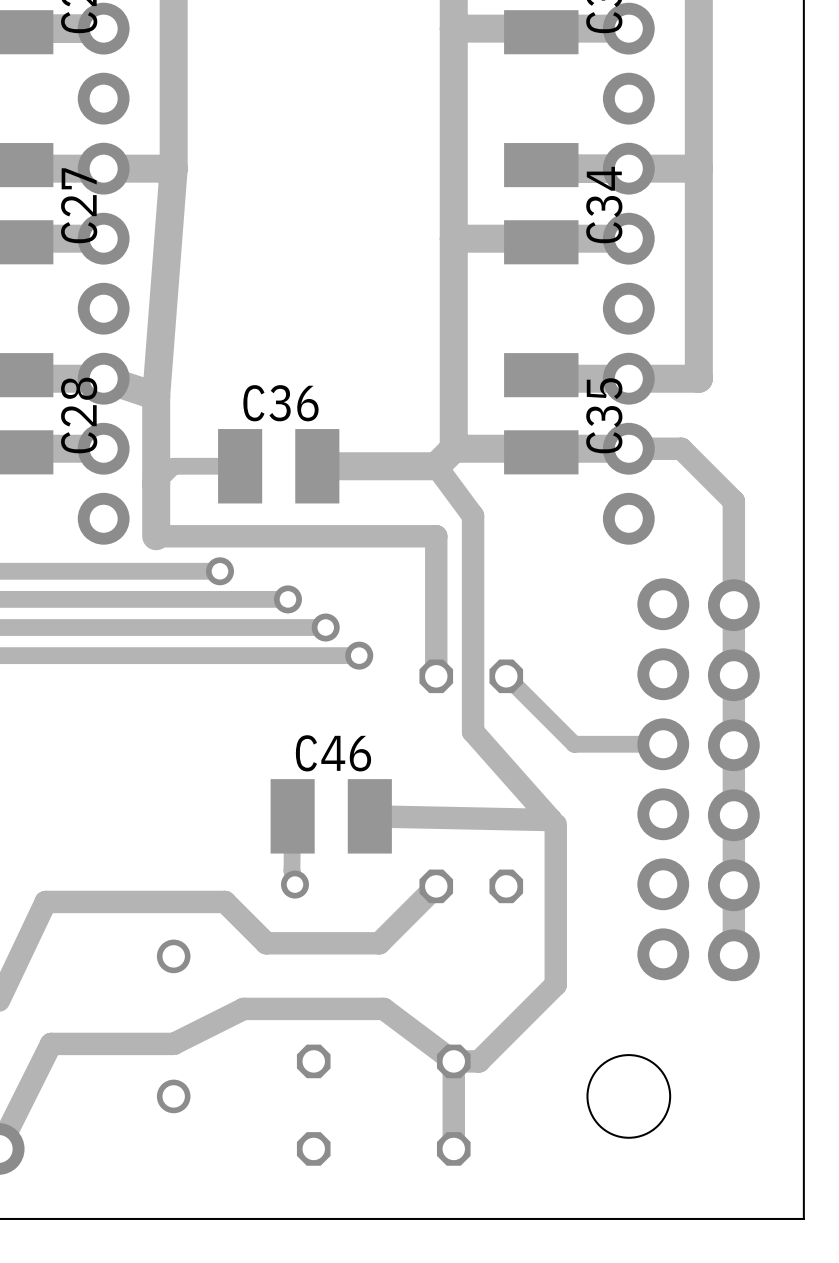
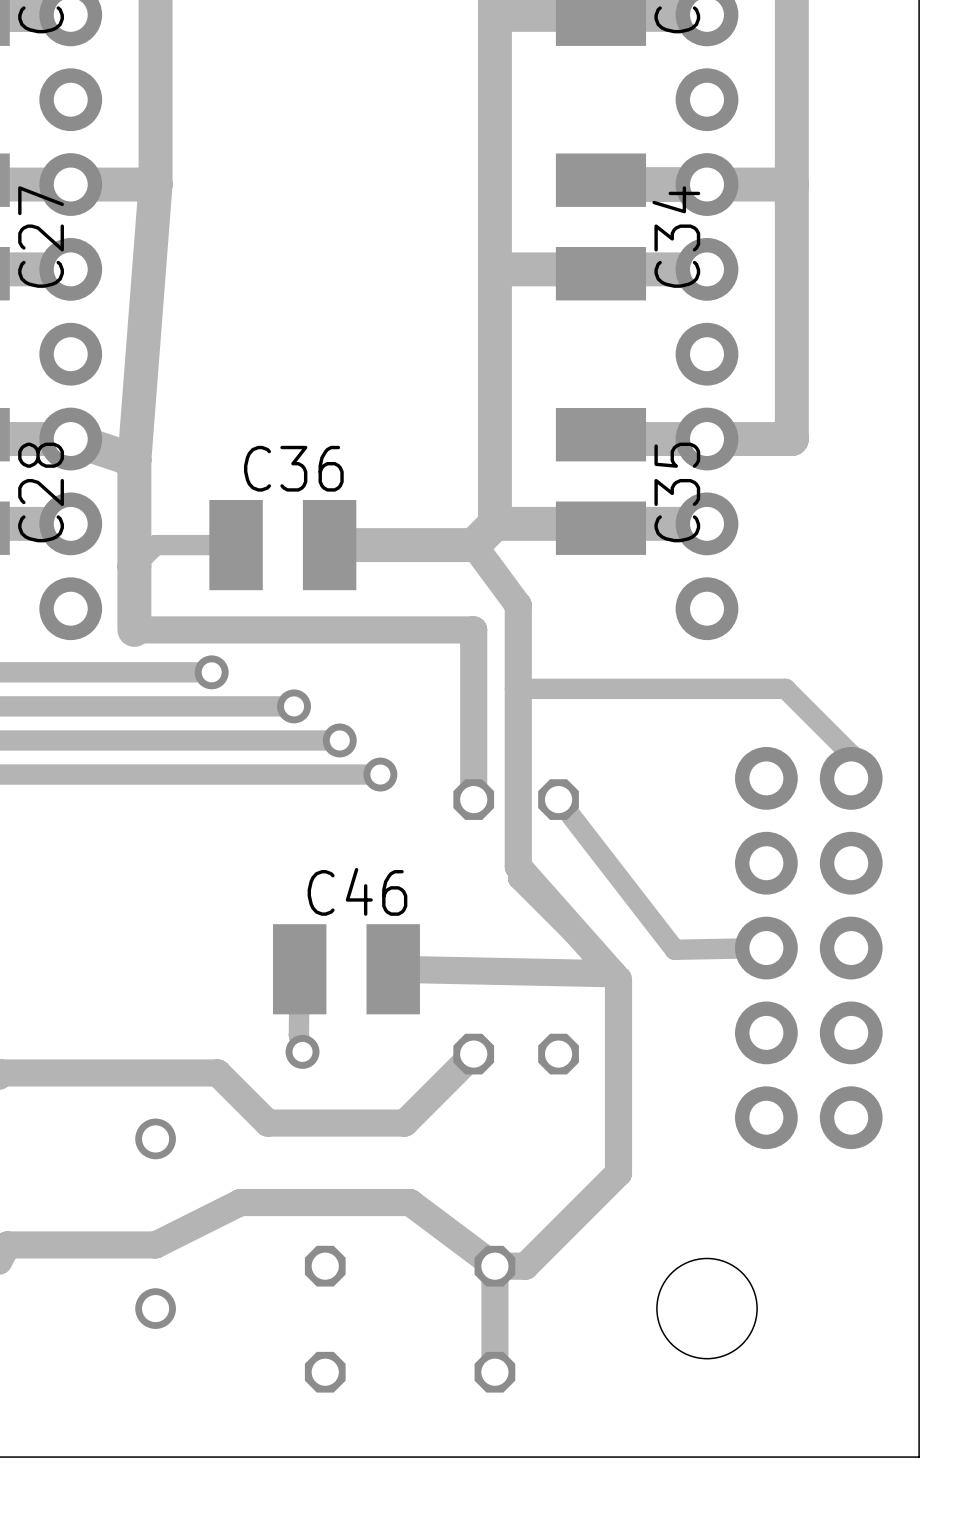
track: (628, 448) (681, 448) (733, 501) (733, 955) -> none
part footprint: [637, 578, 690, 981] -> [735, 746, 798, 1150]
part footprint: [707, 579, 760, 982] -> [819, 746, 883, 1150]
track: none -> (851, 778) (851, 754) (785, 688) (518, 688) (518, 878) (613, 973)
track: (506, 676) (574, 744) (663, 744) -> (558, 799) (674, 949) (766, 948)

